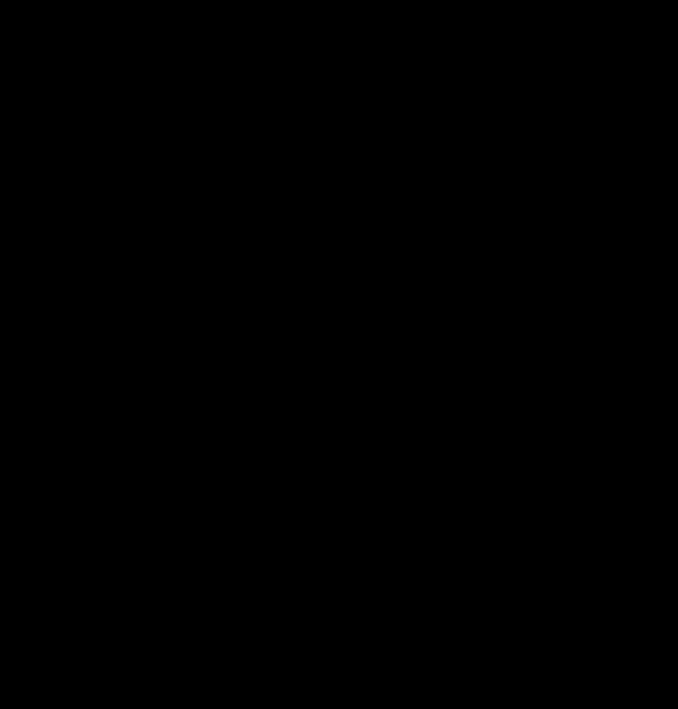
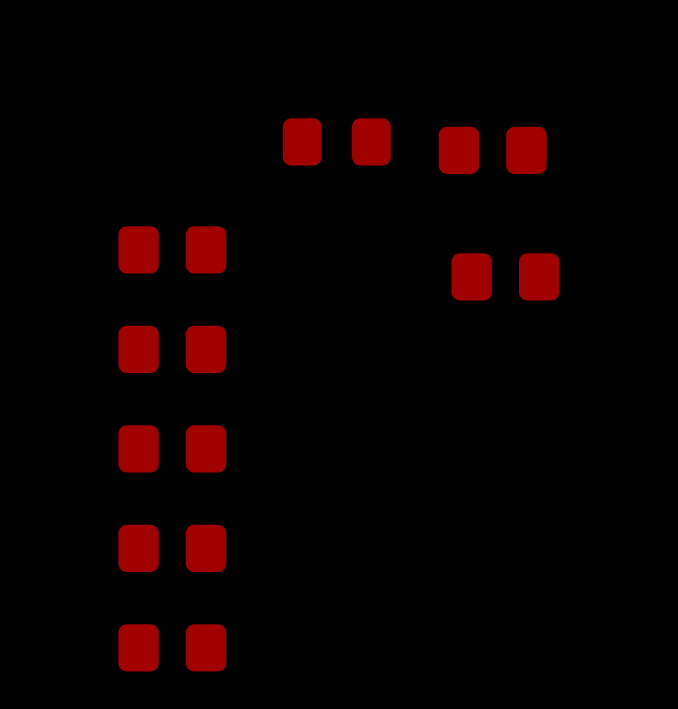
part: none -> (336, 141)
part: none -> (492, 150)
part: none -> (172, 249)
part: none -> (505, 276)
part: none -> (172, 349)
part: none -> (172, 448)
part: none -> (172, 548)
part: none -> (172, 647)

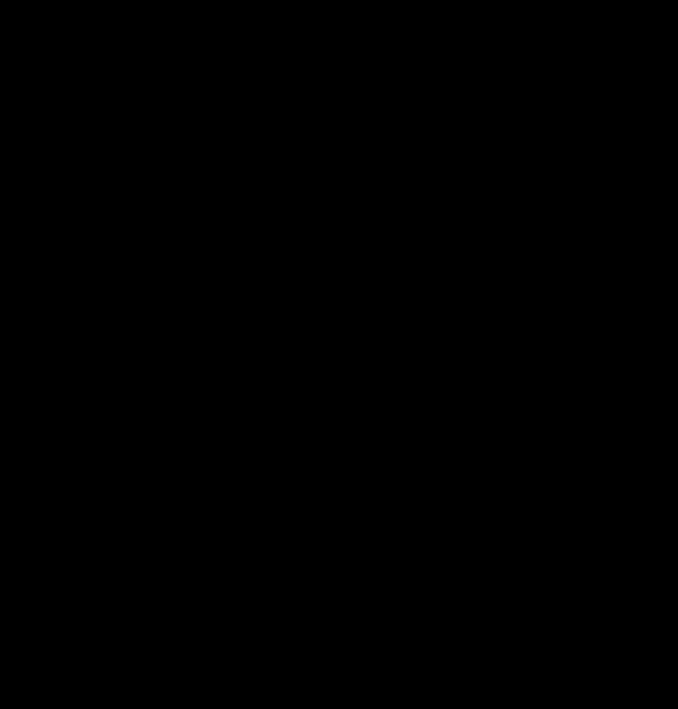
part: (336, 141) -> none
part: (492, 150) -> none
part: (172, 249) -> none
part: (505, 276) -> none
part: (172, 349) -> none
part: (172, 448) -> none
part: (172, 548) -> none
part: (172, 647) -> none

